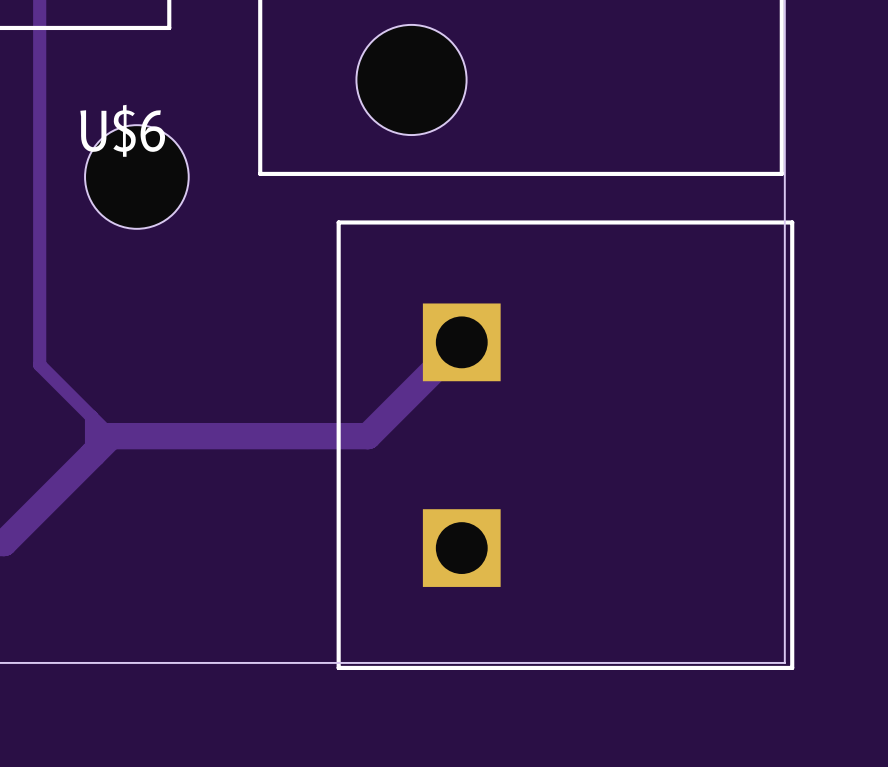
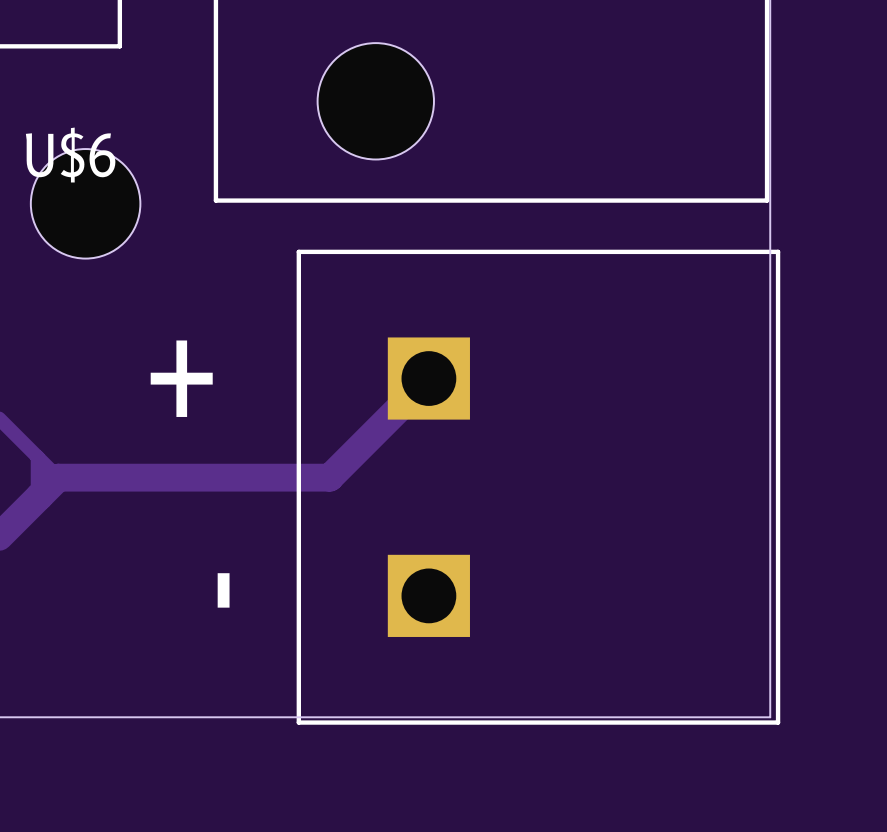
text: none -> + (181, 378)
text: none -> - (223, 590)

